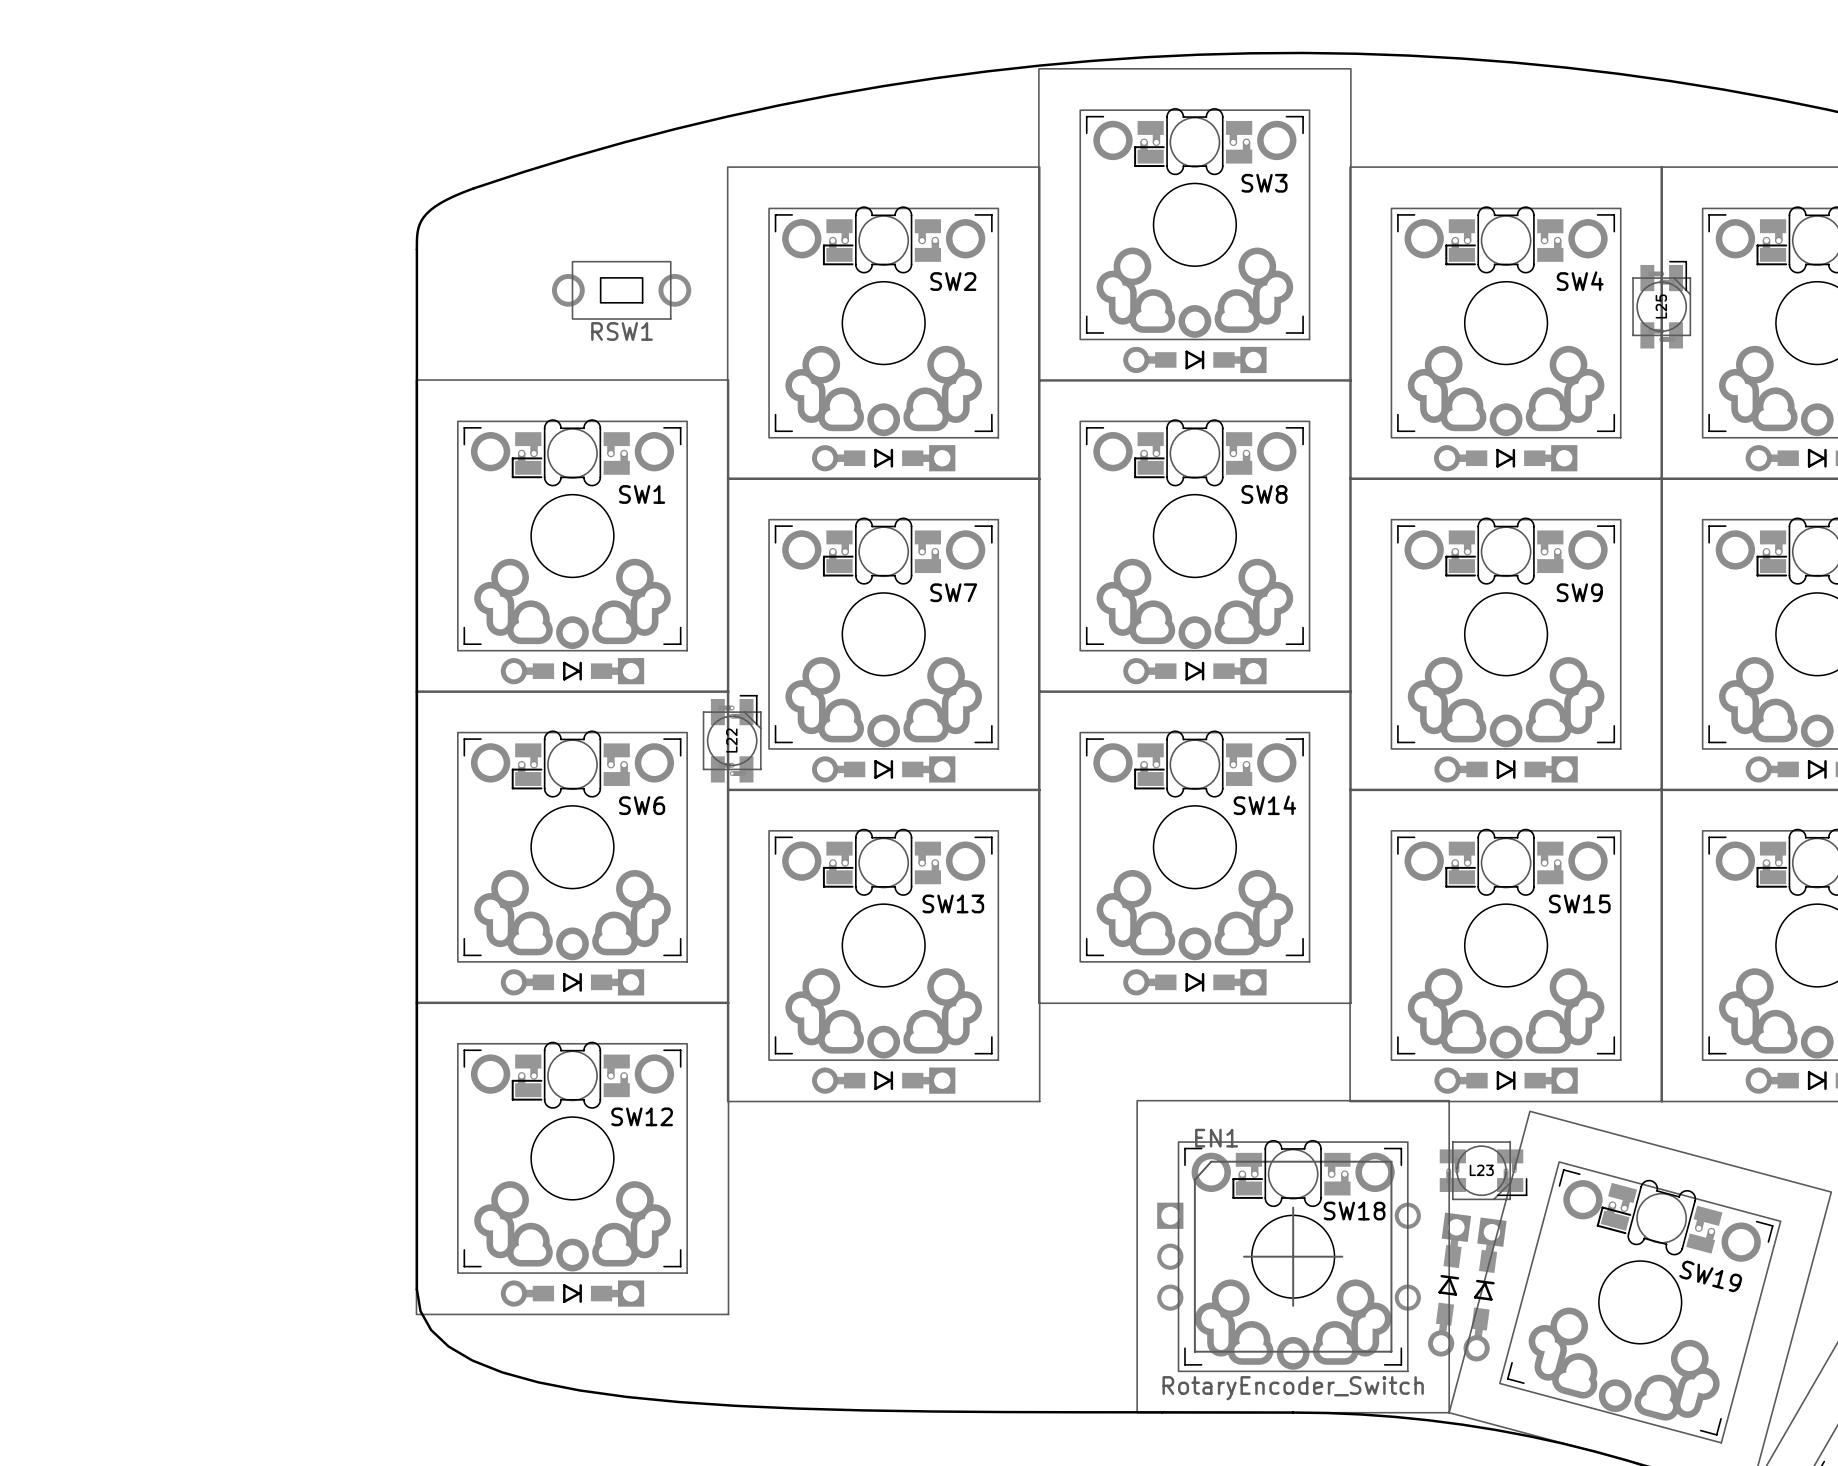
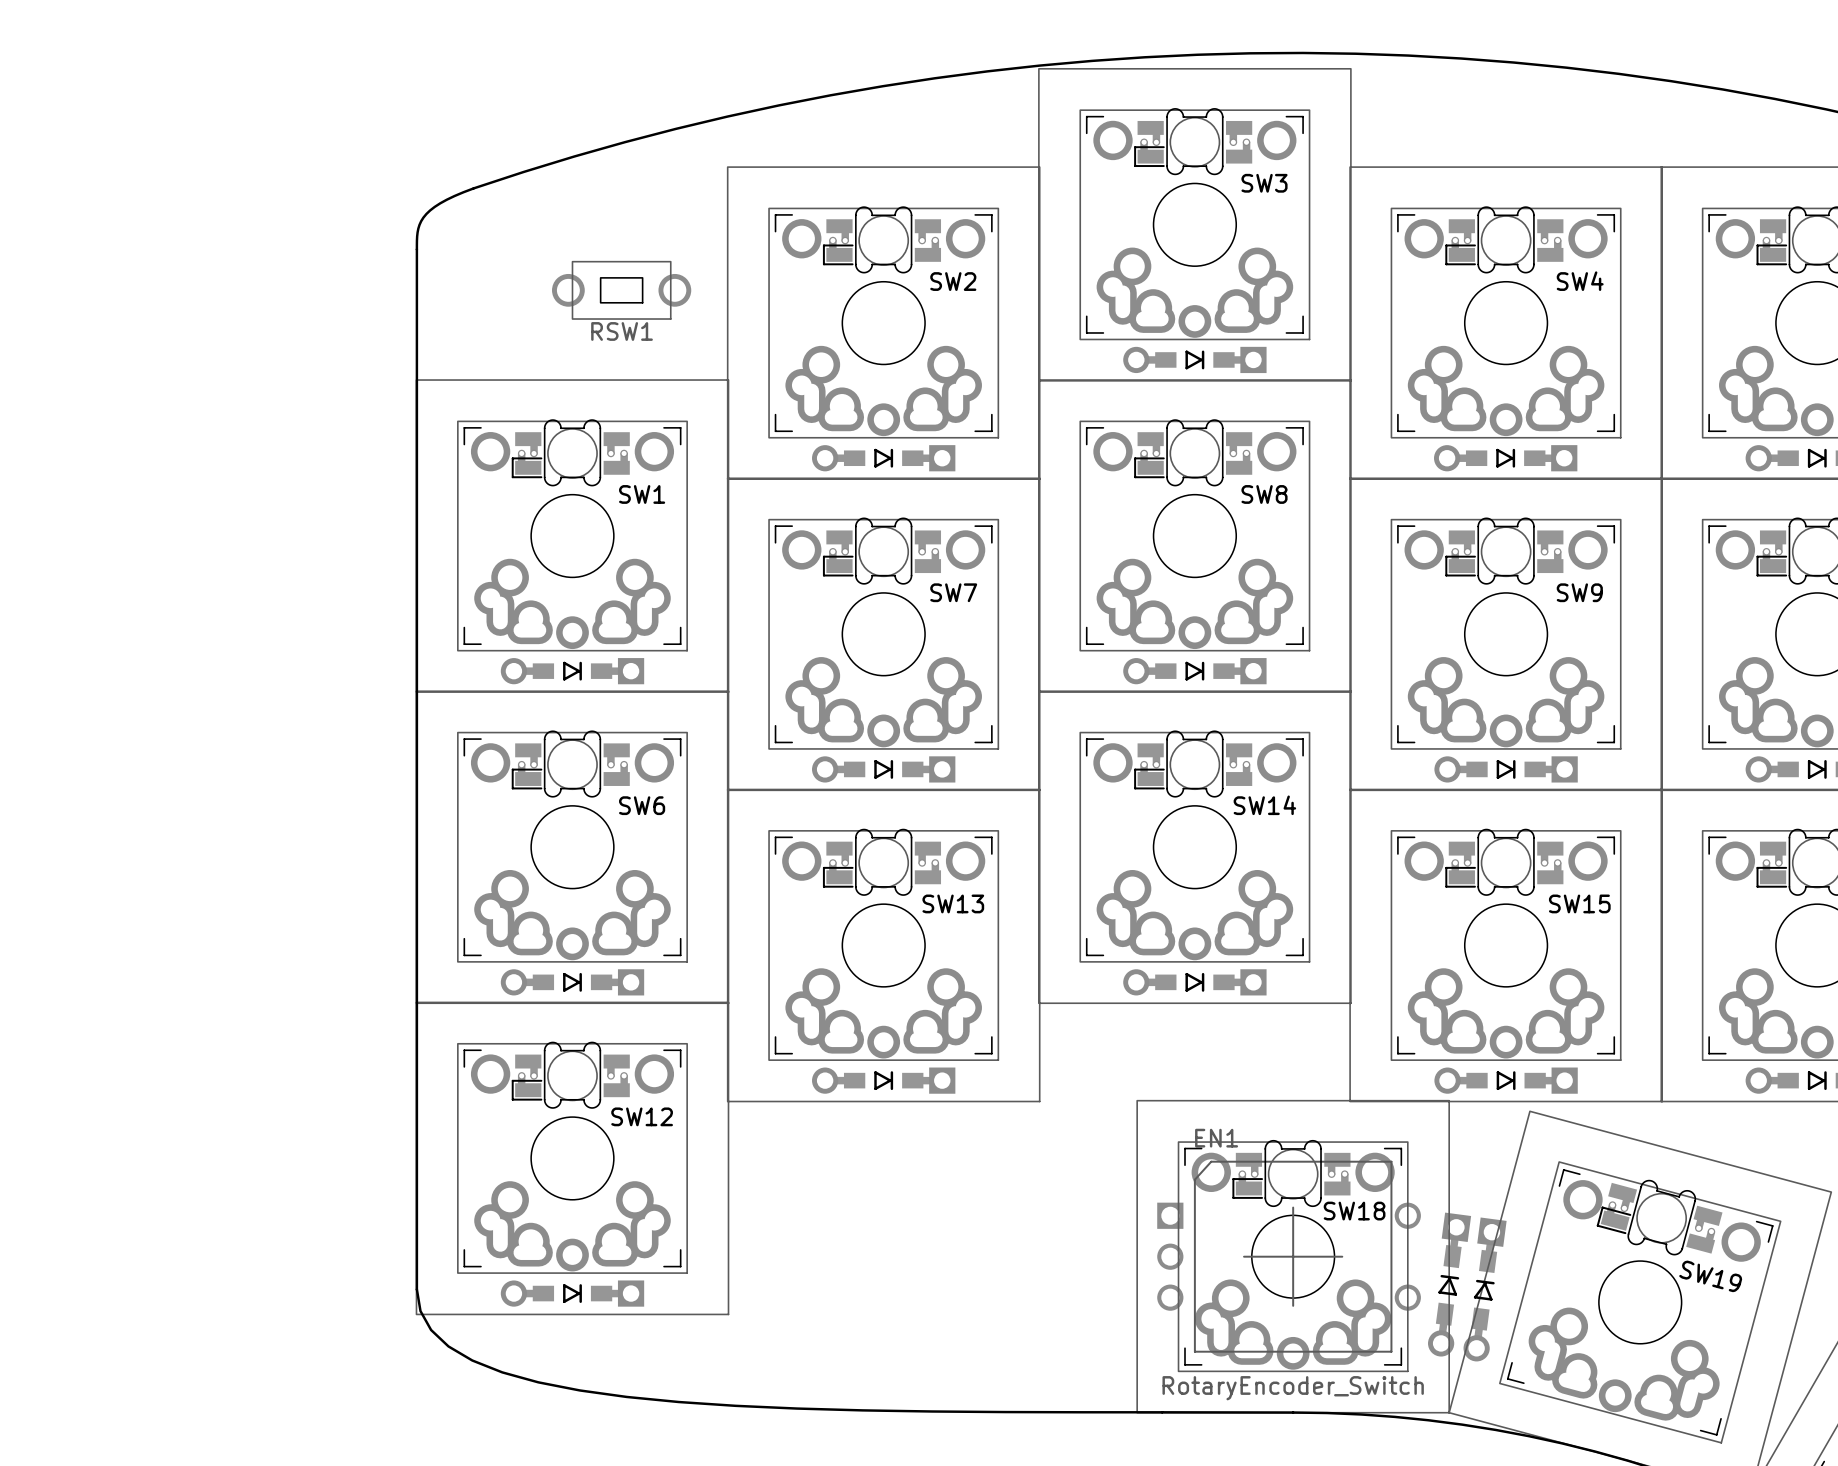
L25: (1661, 304) -> none
L22: (732, 738) -> none
L23: (1483, 1170) -> none

